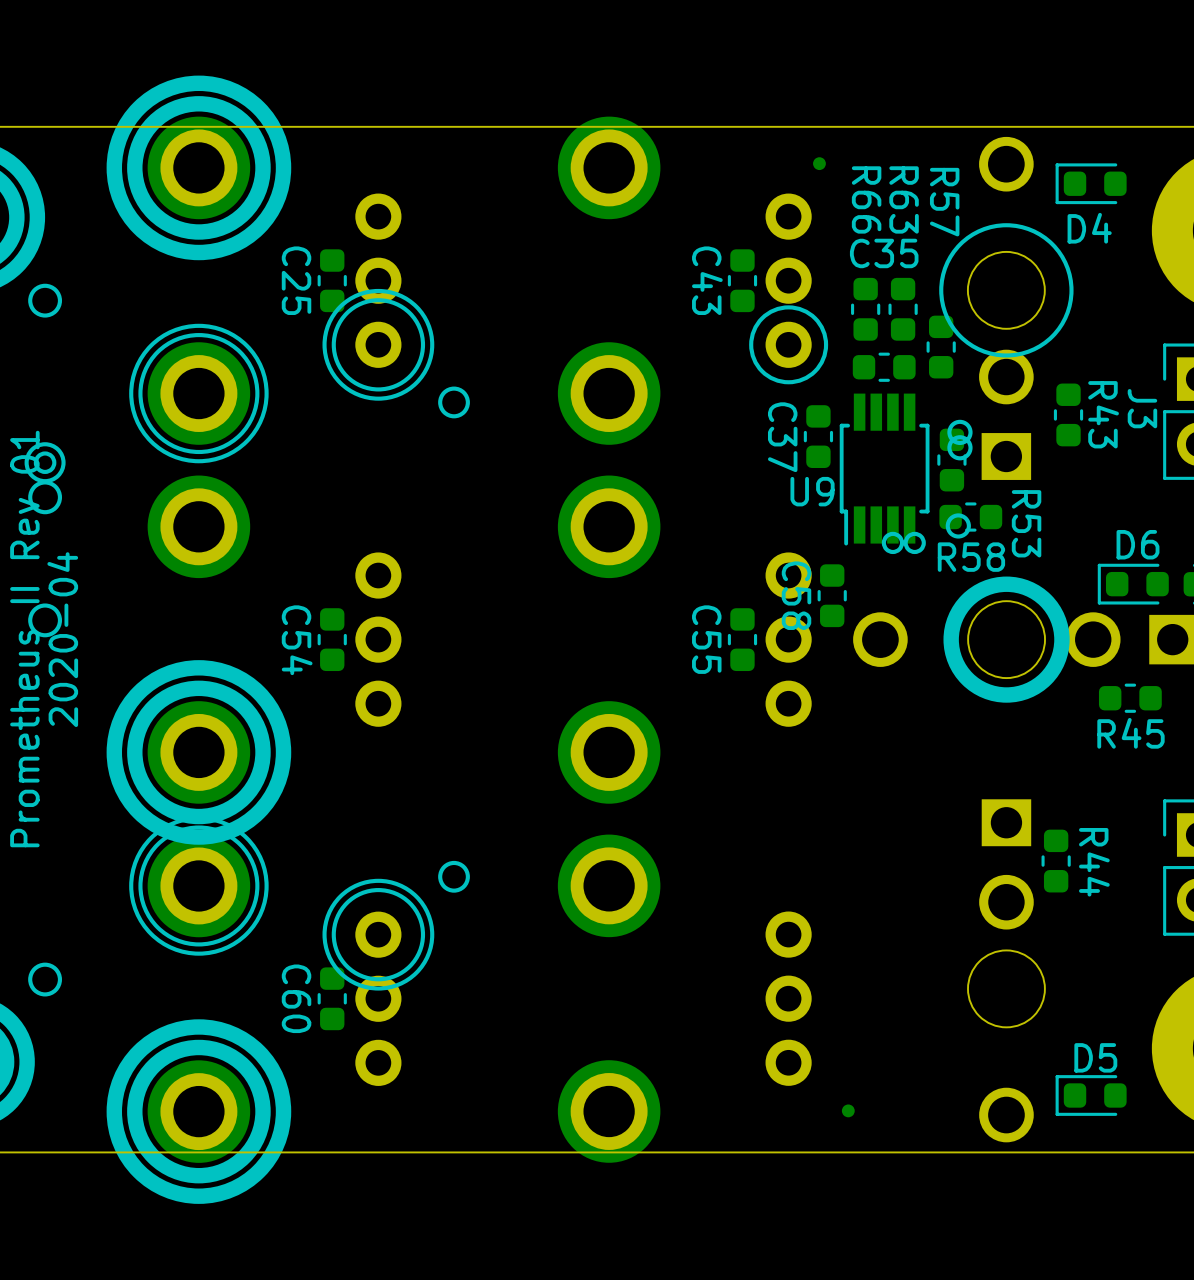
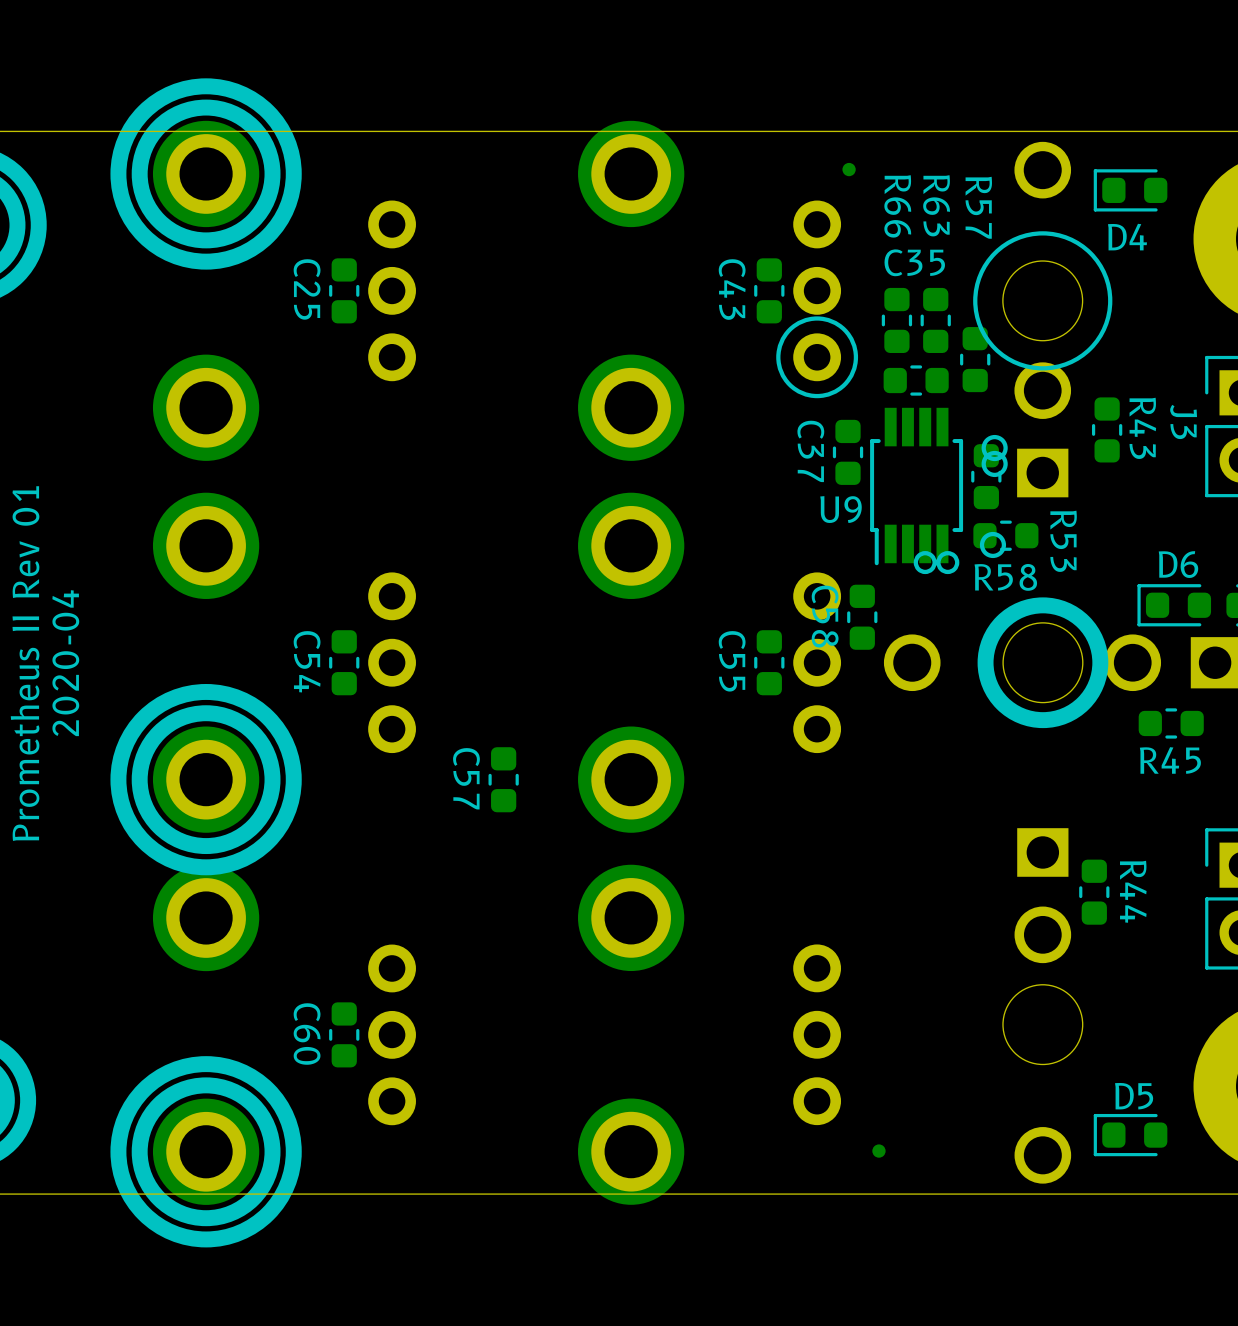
drawing: [28, 283, 63, 318] -> none
drawing: [322, 288, 470, 419] -> none
drawing: [129, 323, 269, 464] -> none
drawing: [24, 442, 66, 515] -> none
drawing: [28, 603, 63, 638] -> none
C57: none -> (503, 779)
drawing: [129, 816, 269, 956] -> none
drawing: [322, 860, 470, 991] -> none
drawing: [28, 962, 62, 997] -> none

